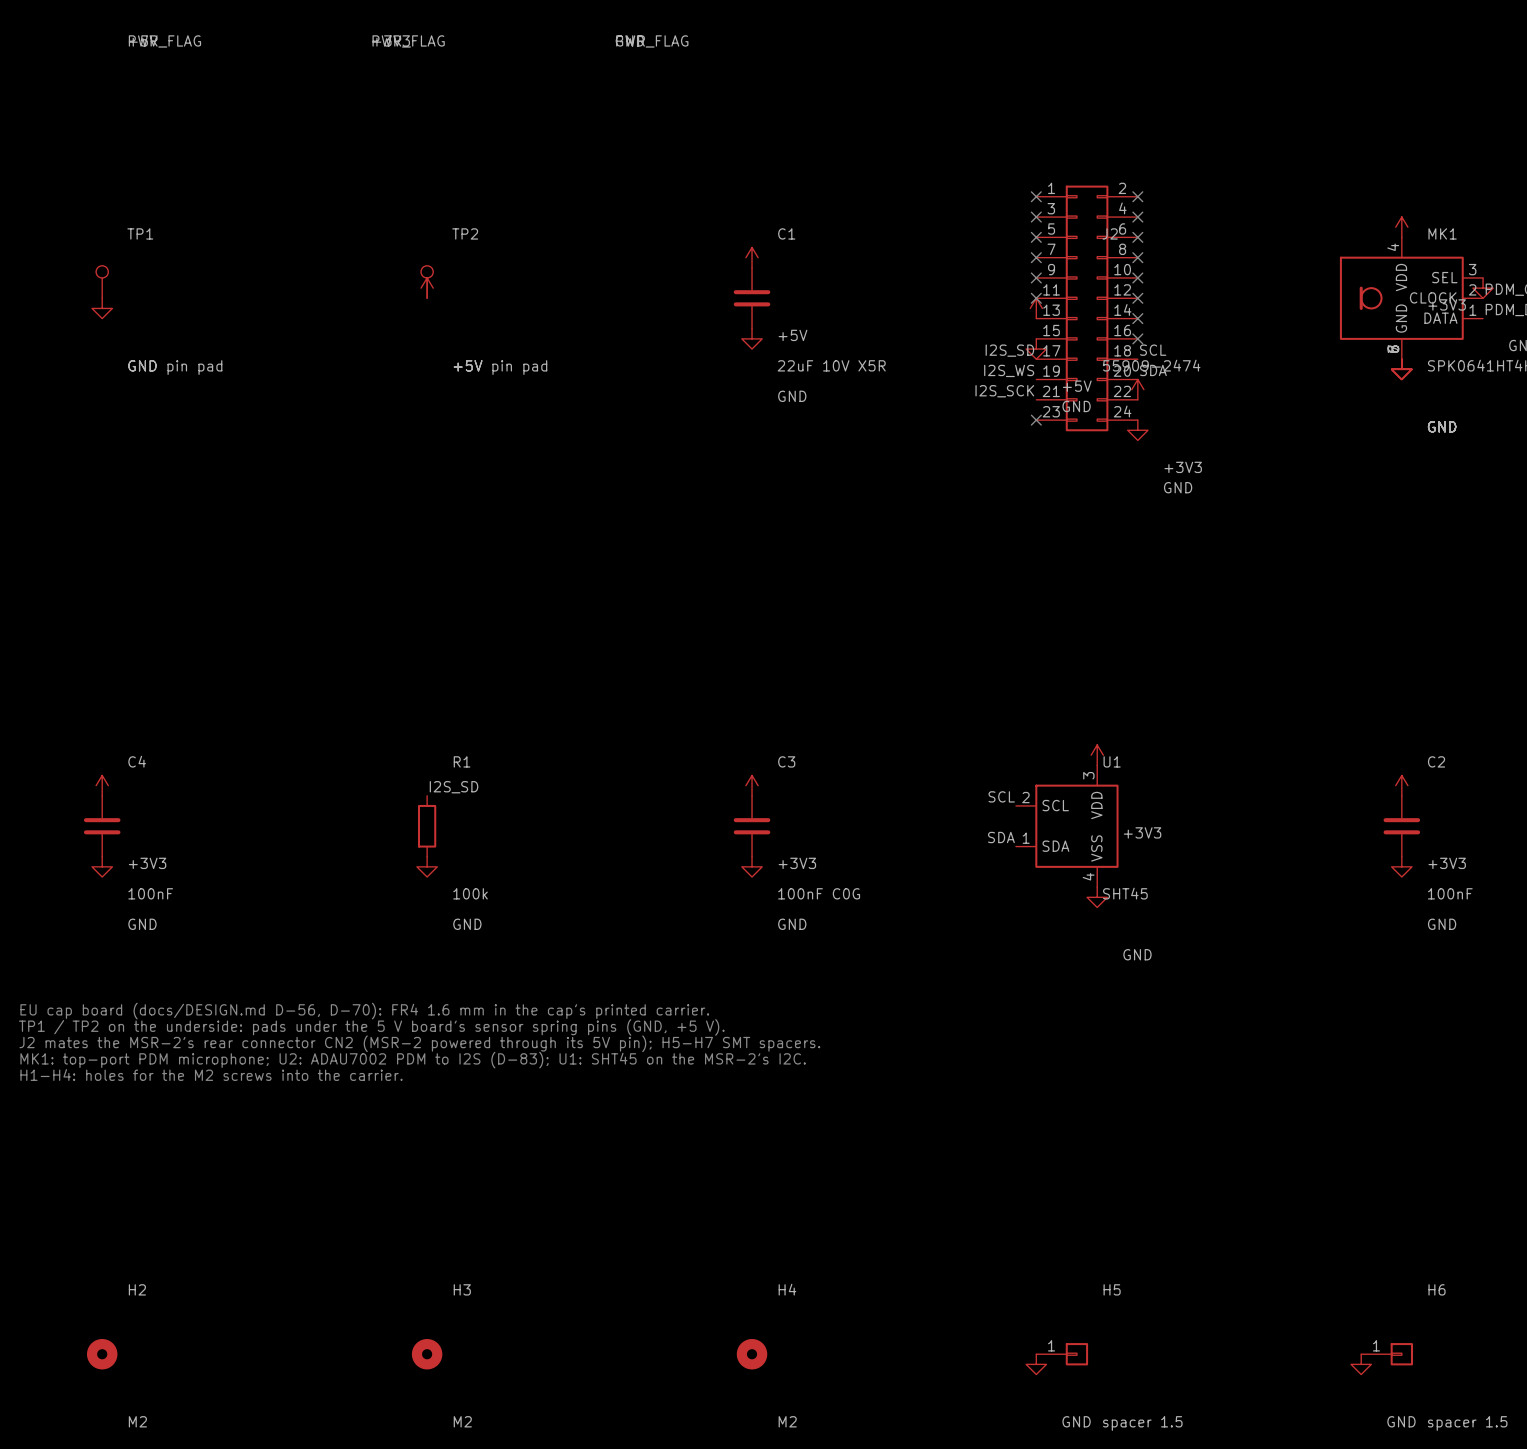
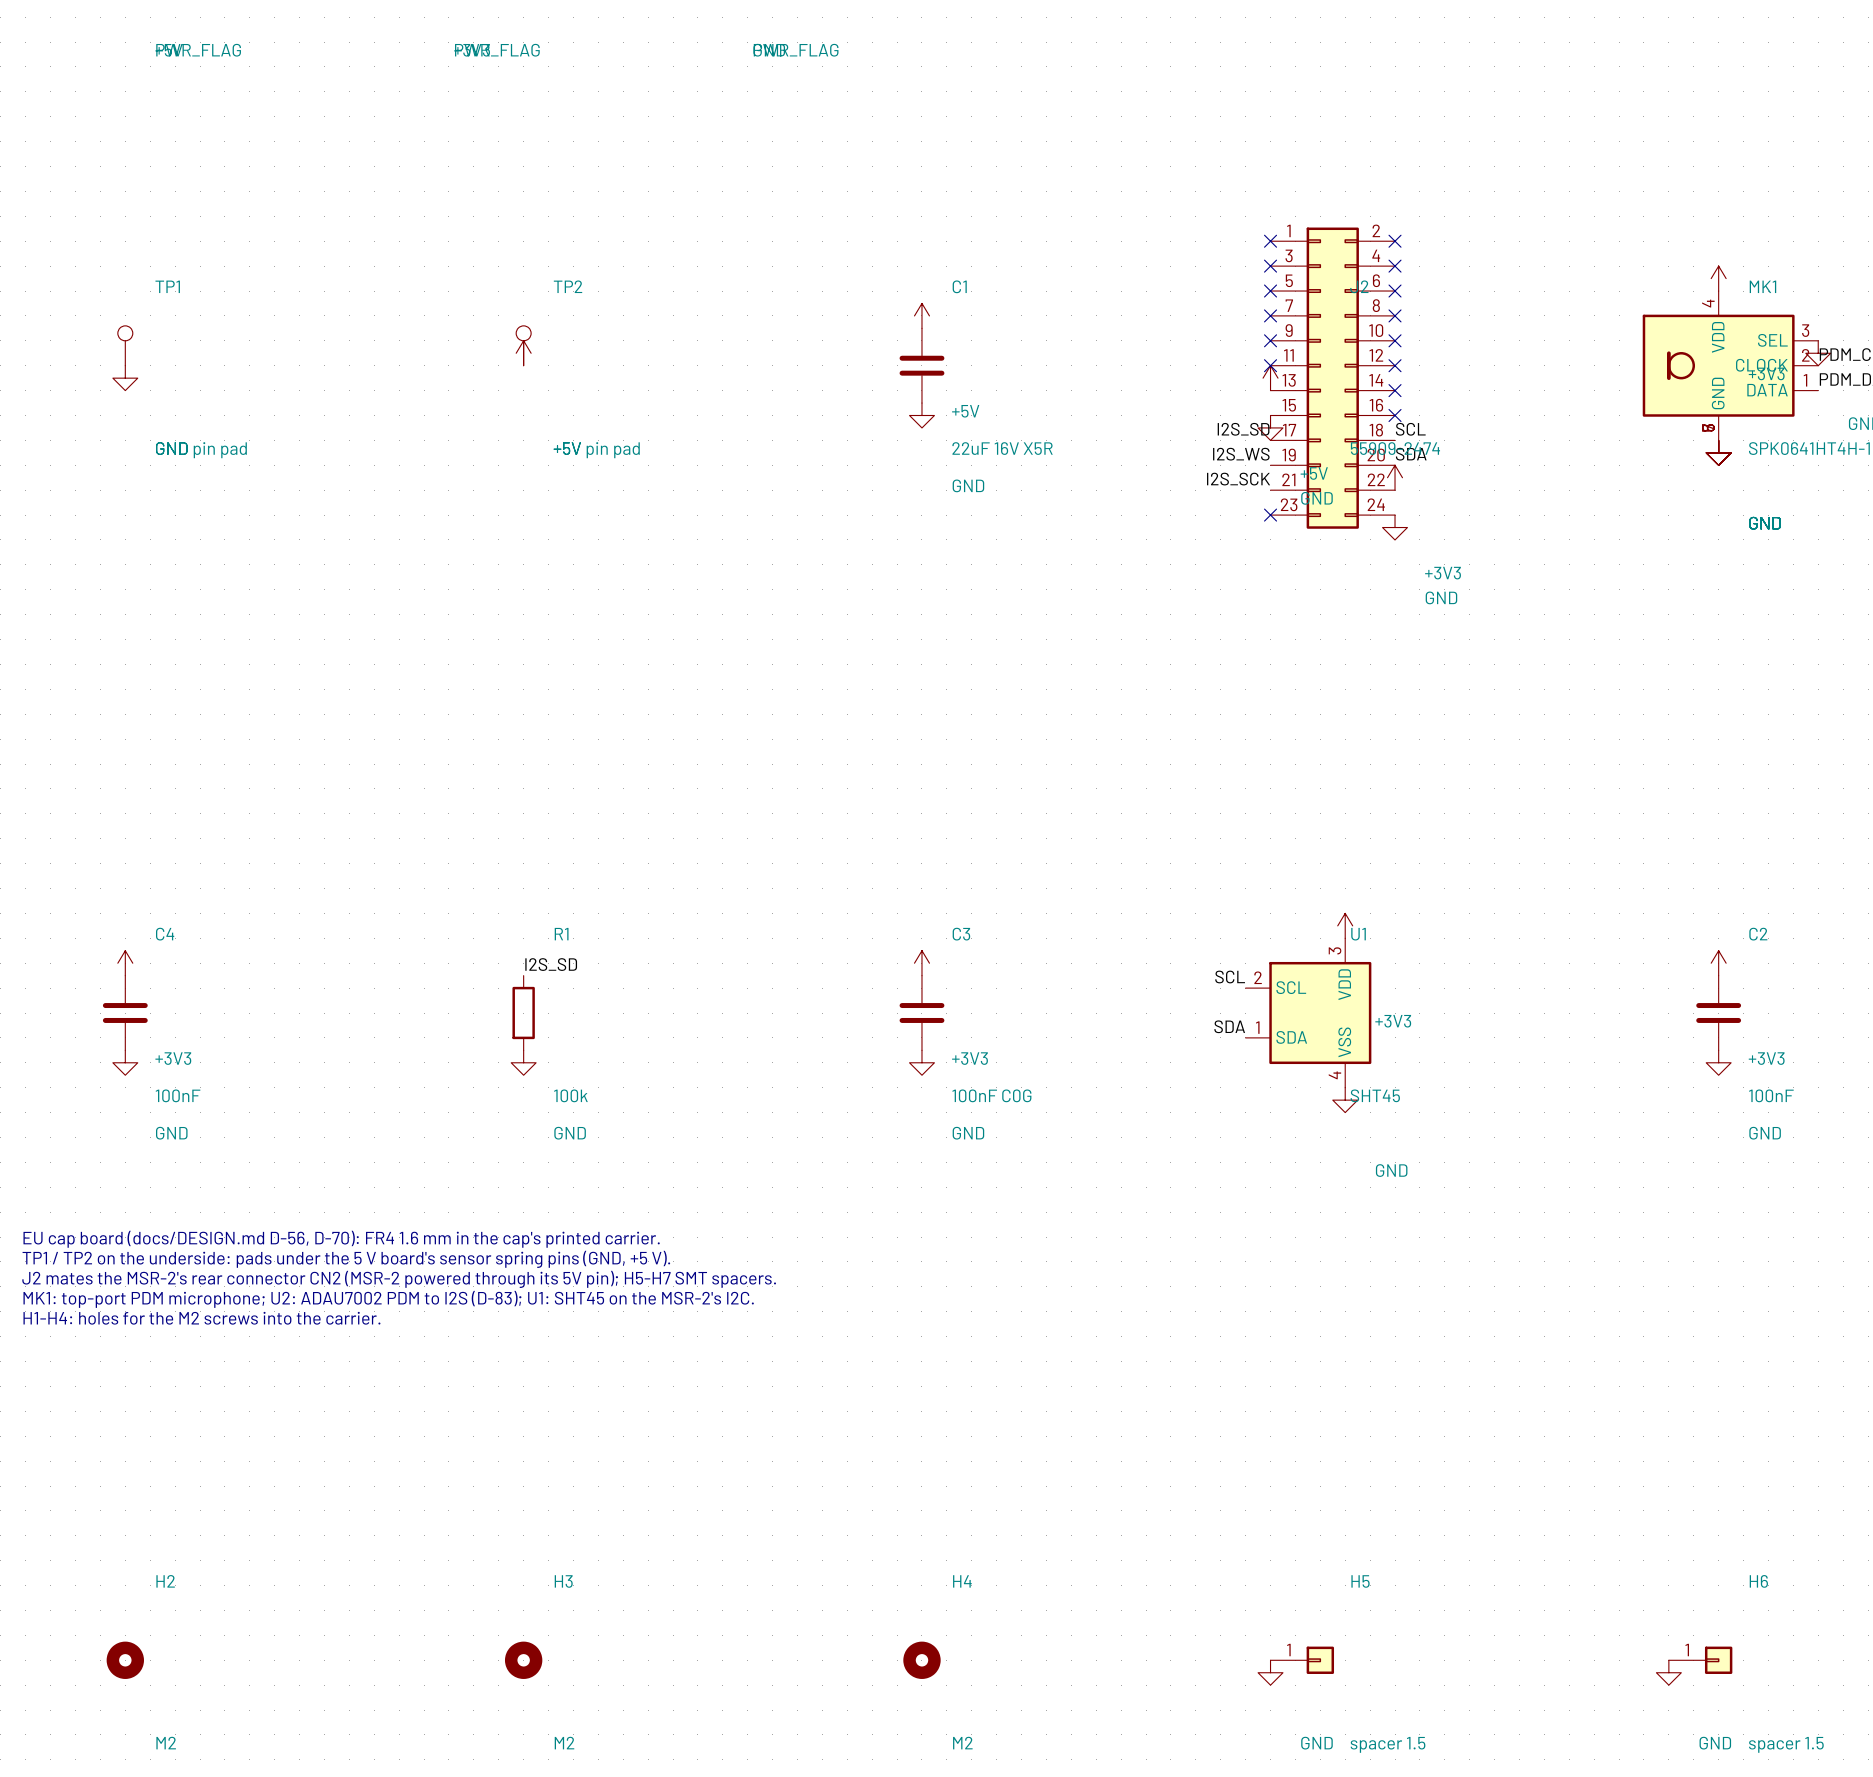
C1 value: 22uF 10V X5R (831, 365) -> 22uF 16V X5R (1002, 448)

